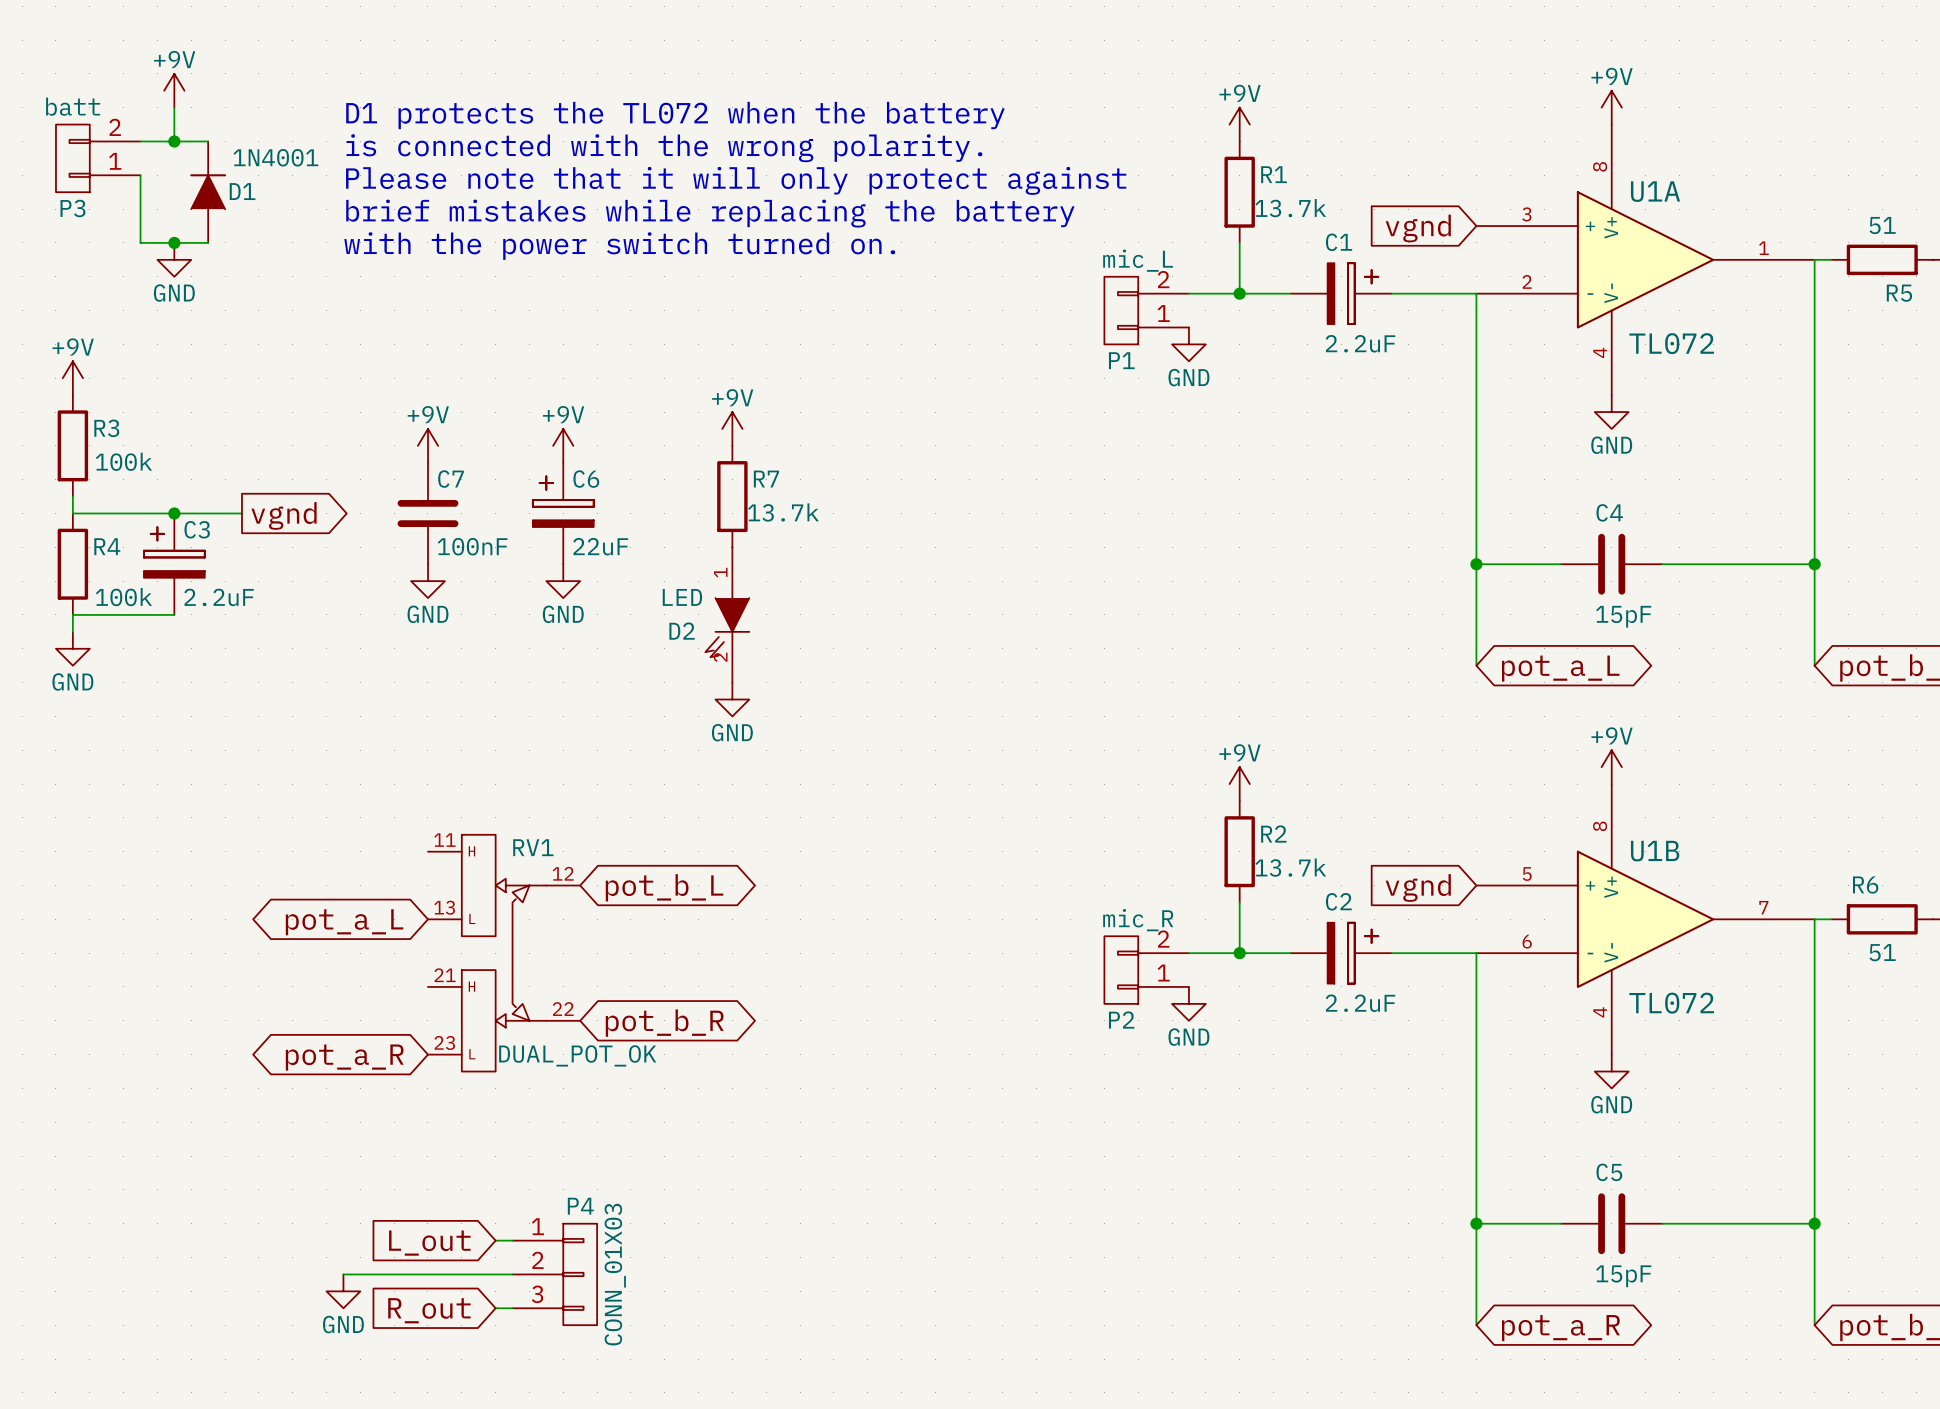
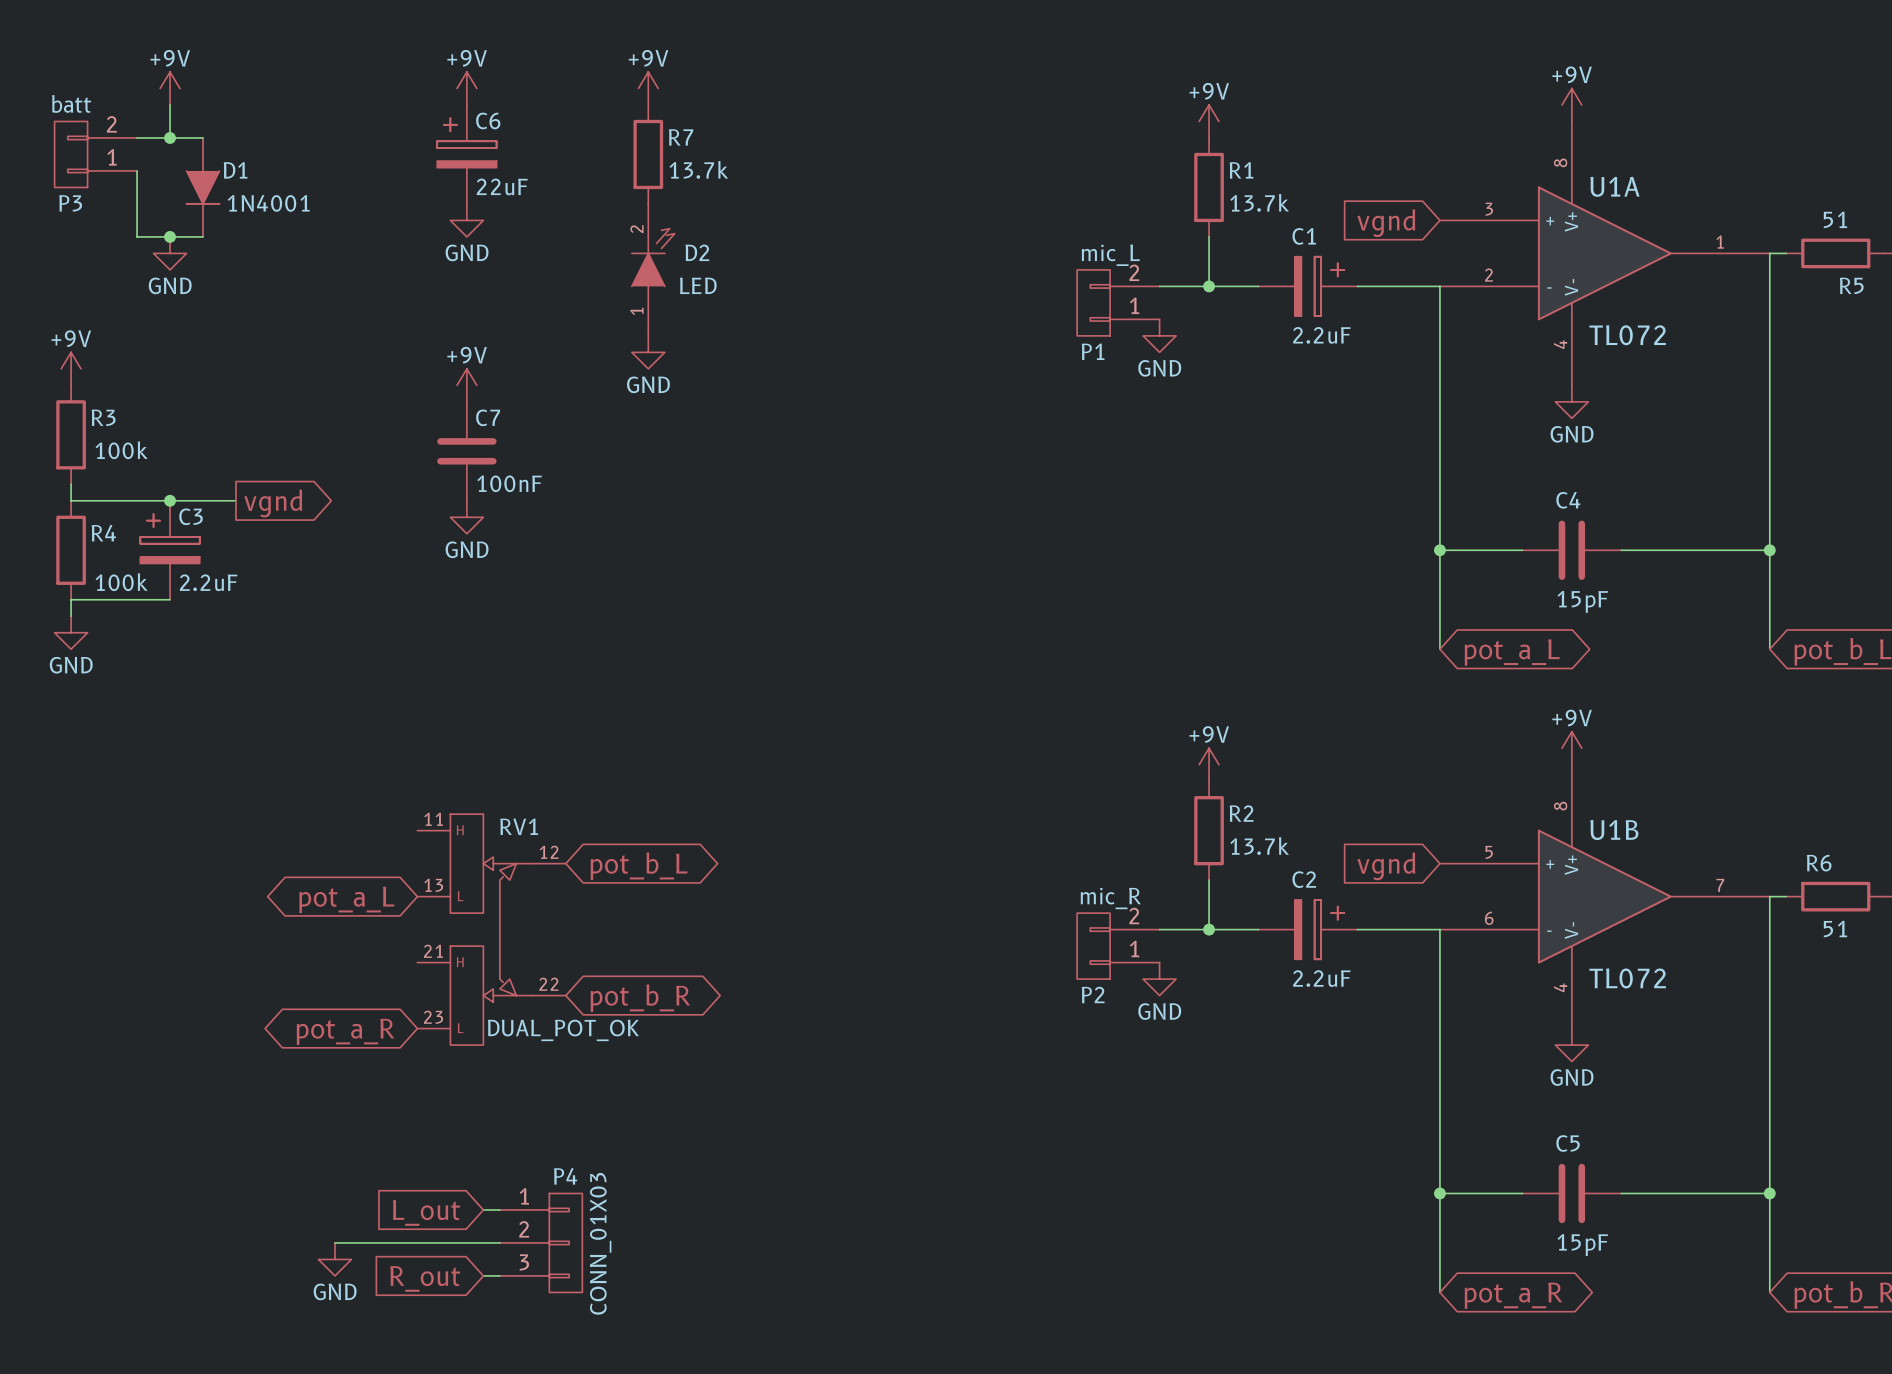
power symbol: none -> +9V (466, 88)
power symbol: none -> +9V (648, 88)
text: D1 protects the TL072 when the battery (675, 115) -> none
text: is connected with the wrong polarity. (664, 148) -> none
D1 value position: 1N4001 (275, 157) -> 1N4001 (268, 203)
text: Please note that it will only protect against (736, 180) -> none
D1 rotation: 0° (208, 191) -> 180° (203, 187)
text: brief mistakes while replacing the battery (710, 213) -> none
power symbol: none -> GND (466, 220)
text: with the power switch turned on. (619, 246) -> none
power symbol: none -> GND (648, 352)
power symbol: none -> +9V (466, 385)
power symbol: +9V (732, 428) -> none
power symbol: +9V (427, 445) -> none
power symbol: +9V (563, 445) -> none
R7 position: (732, 496) -> (648, 154)
C7 position: (427, 513) -> (466, 451)
C6 position: (563, 513) -> (466, 154)
power symbol: none -> GND (466, 517)
power symbol: GND (427, 581) -> none
power symbol: GND (563, 581) -> none
D2 position: (727, 614) -> (653, 269)
D2 rotation: 0° (727, 627) -> 180° (653, 257)
power symbol: GND (732, 699) -> none

